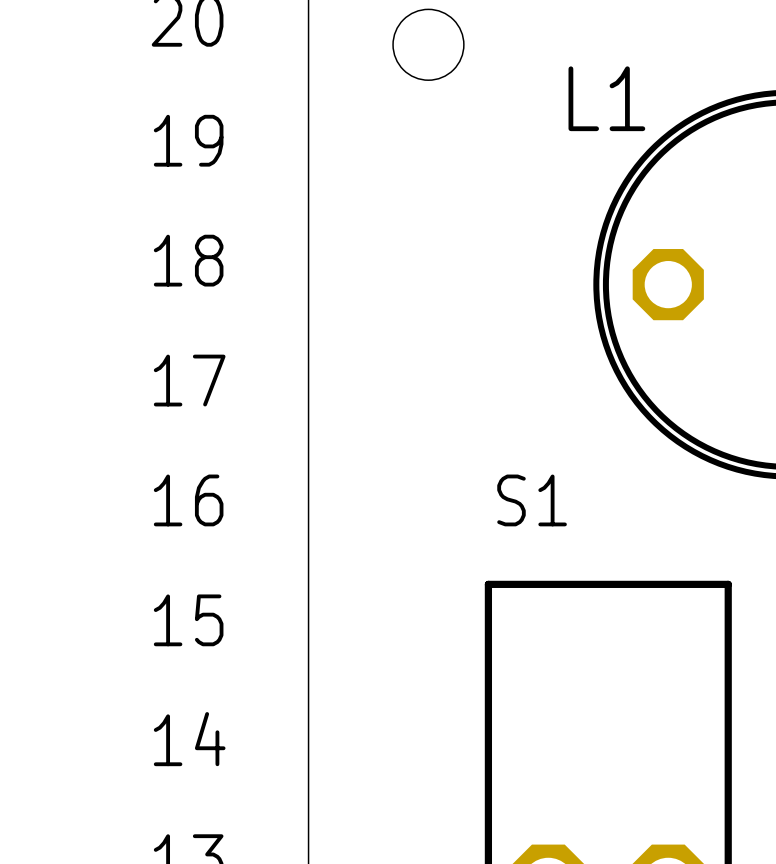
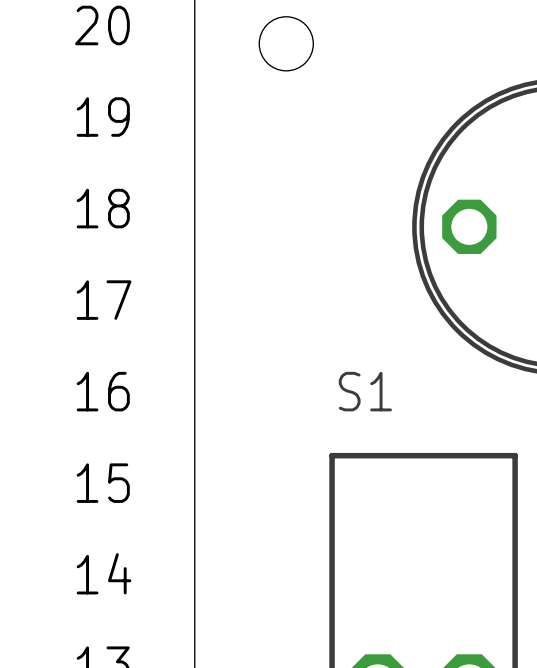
L1 name: L1 (606, 98) -> none

